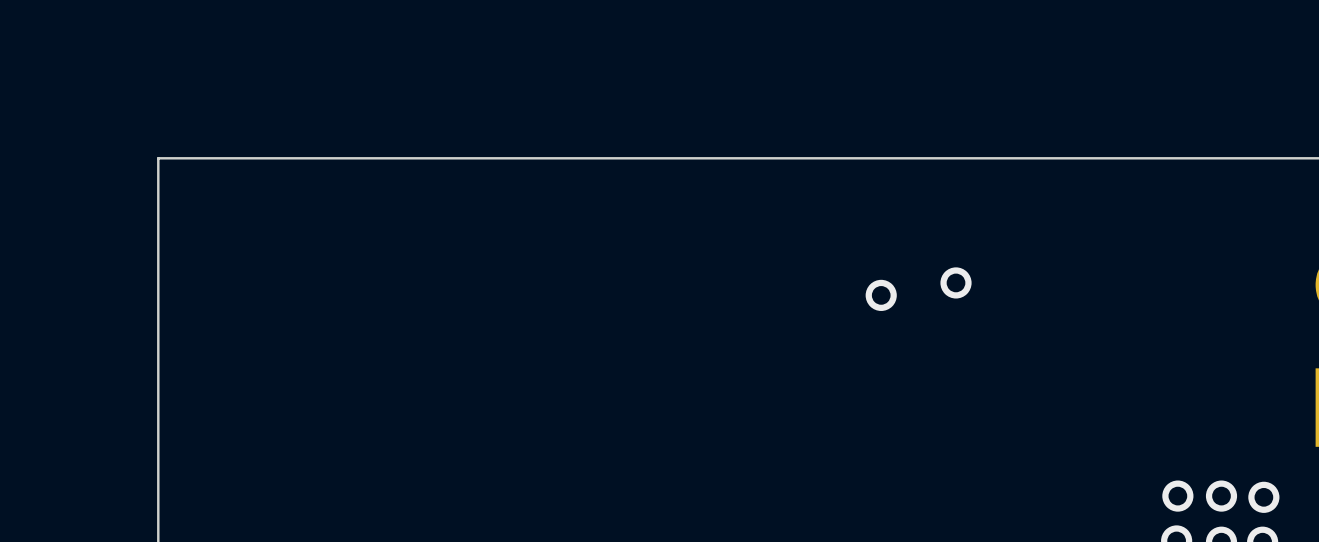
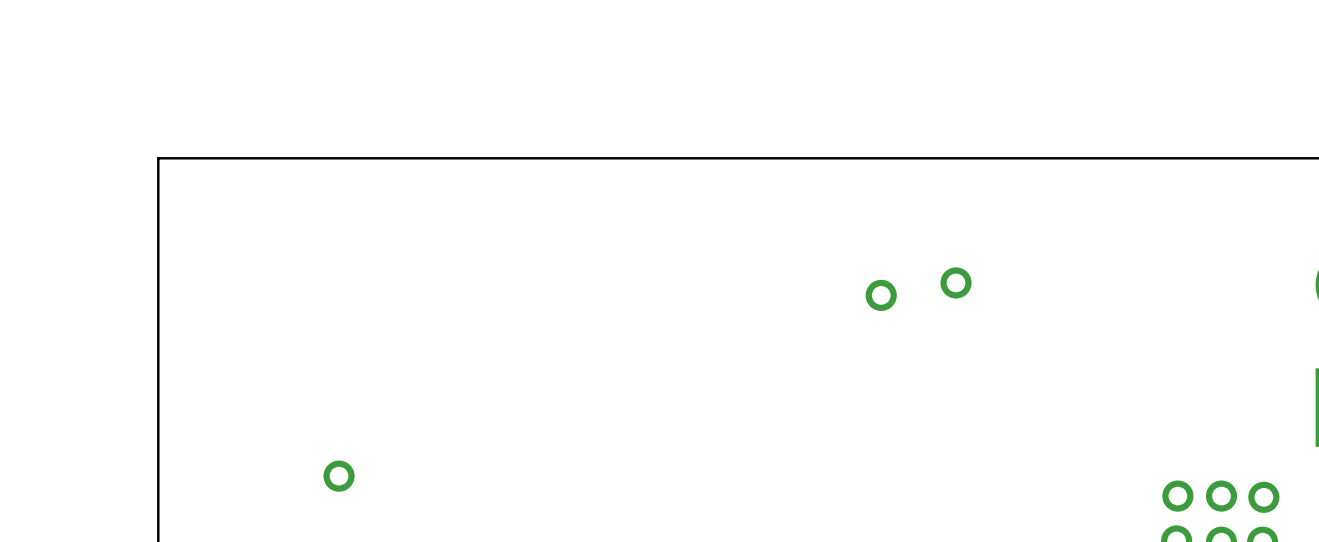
via: none -> (339, 476)

